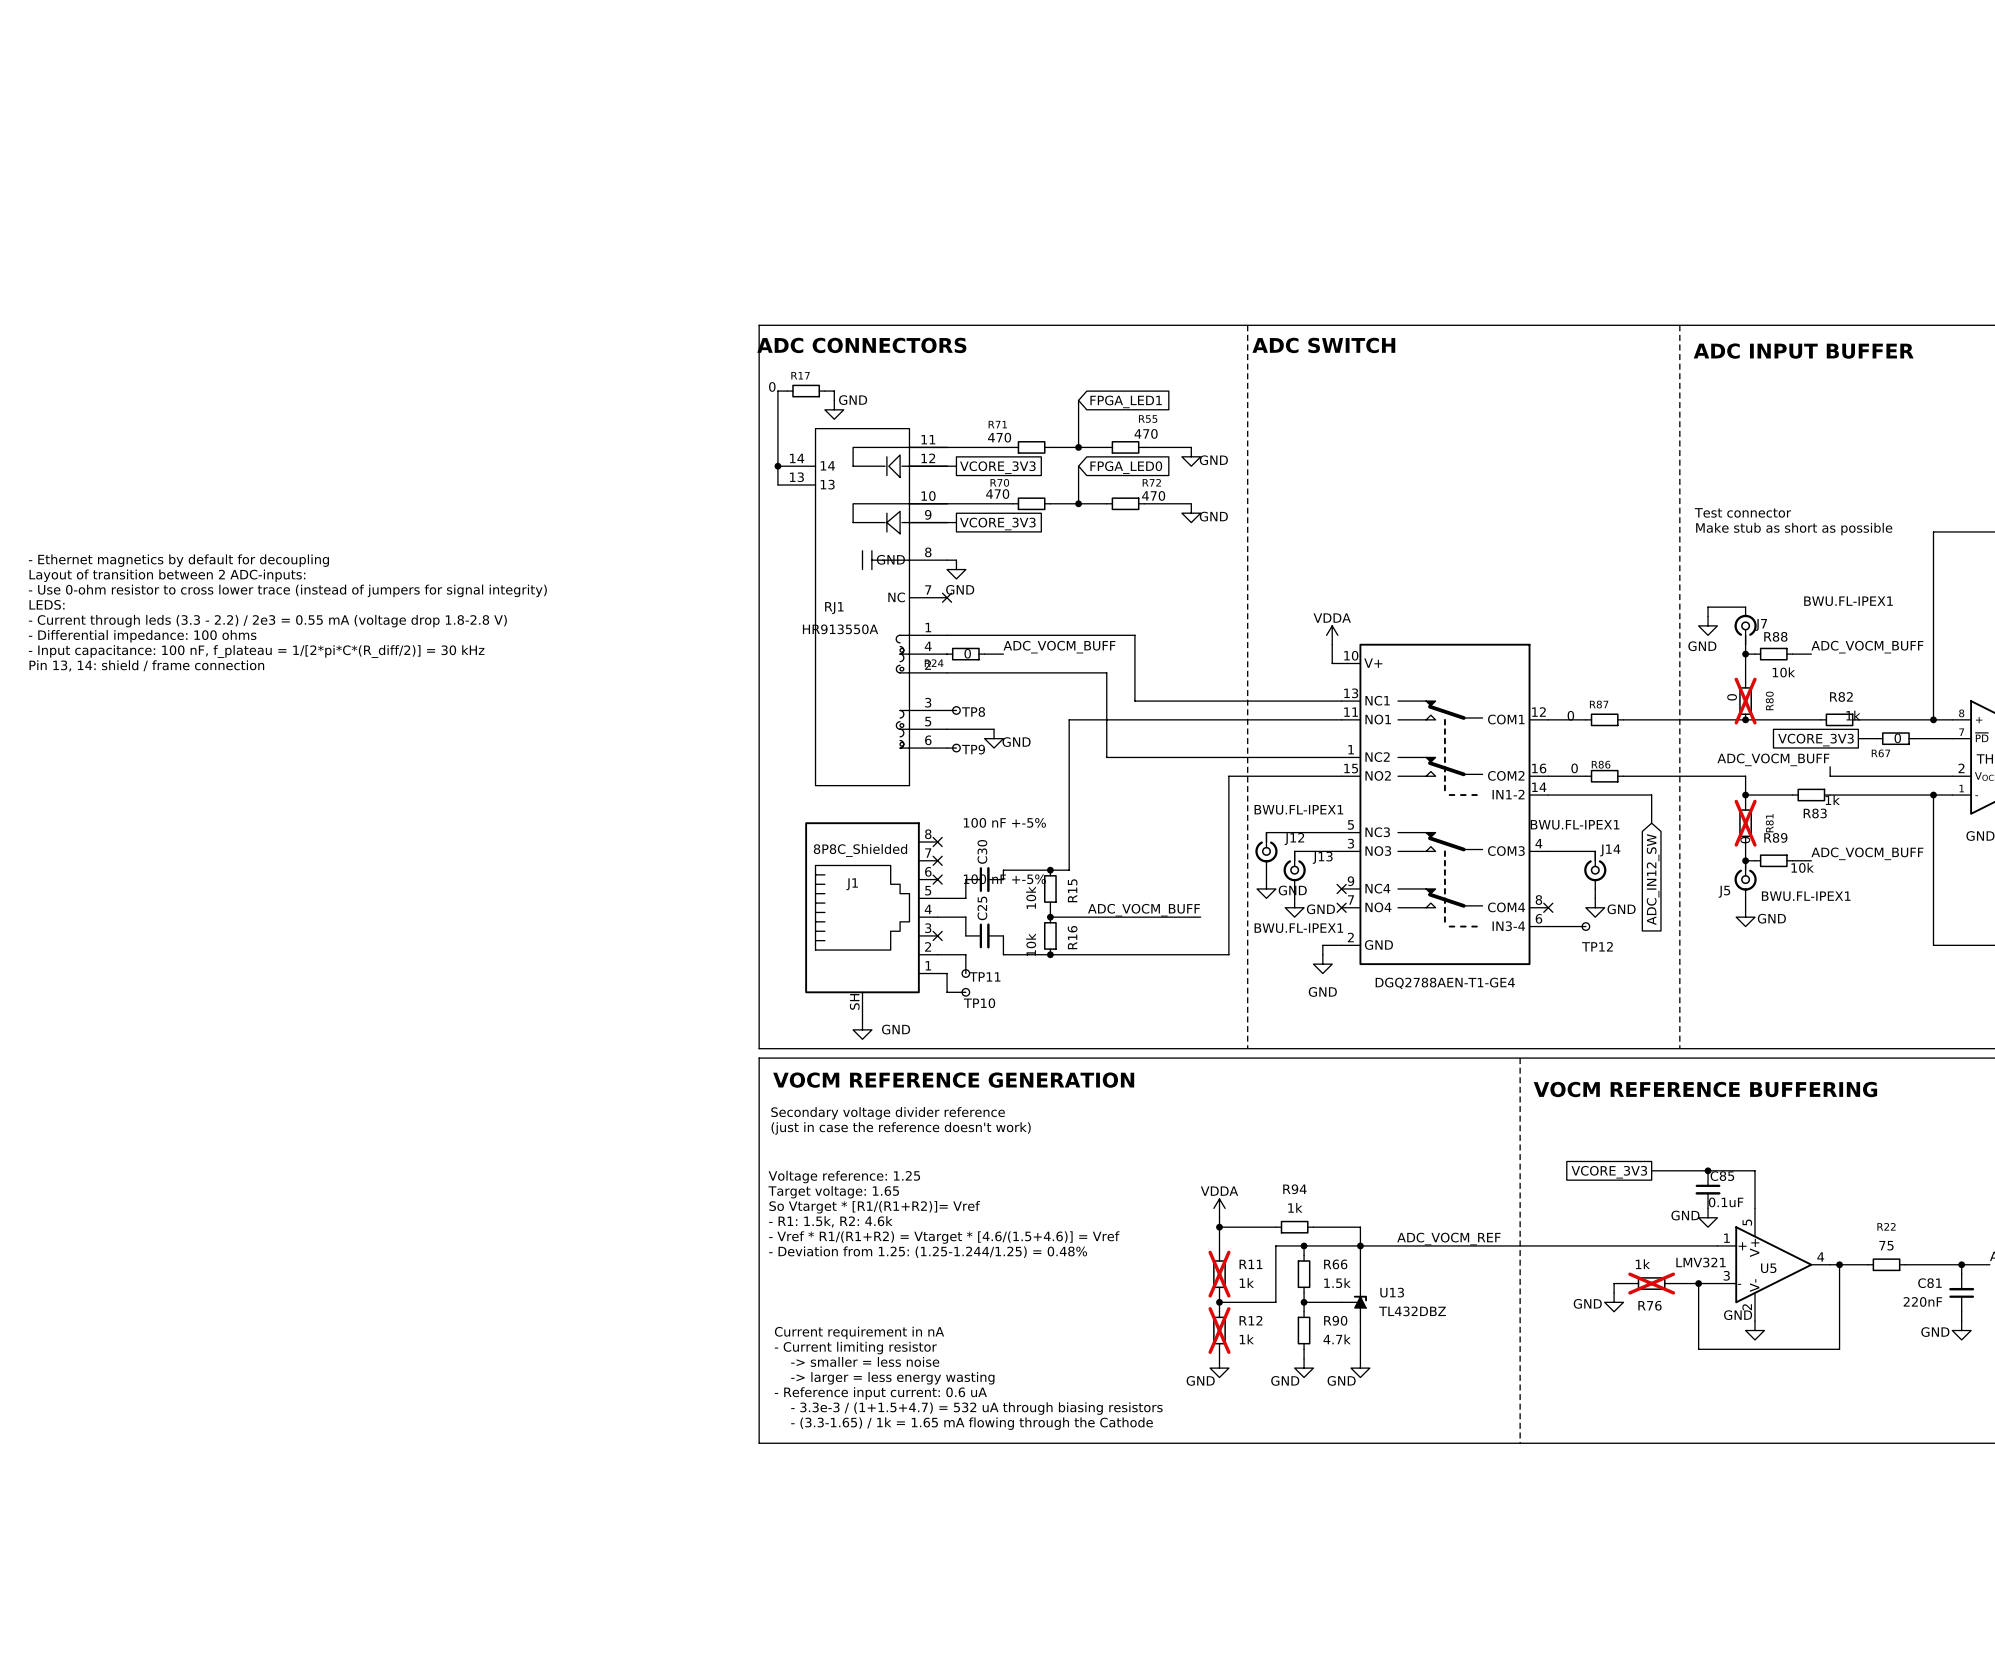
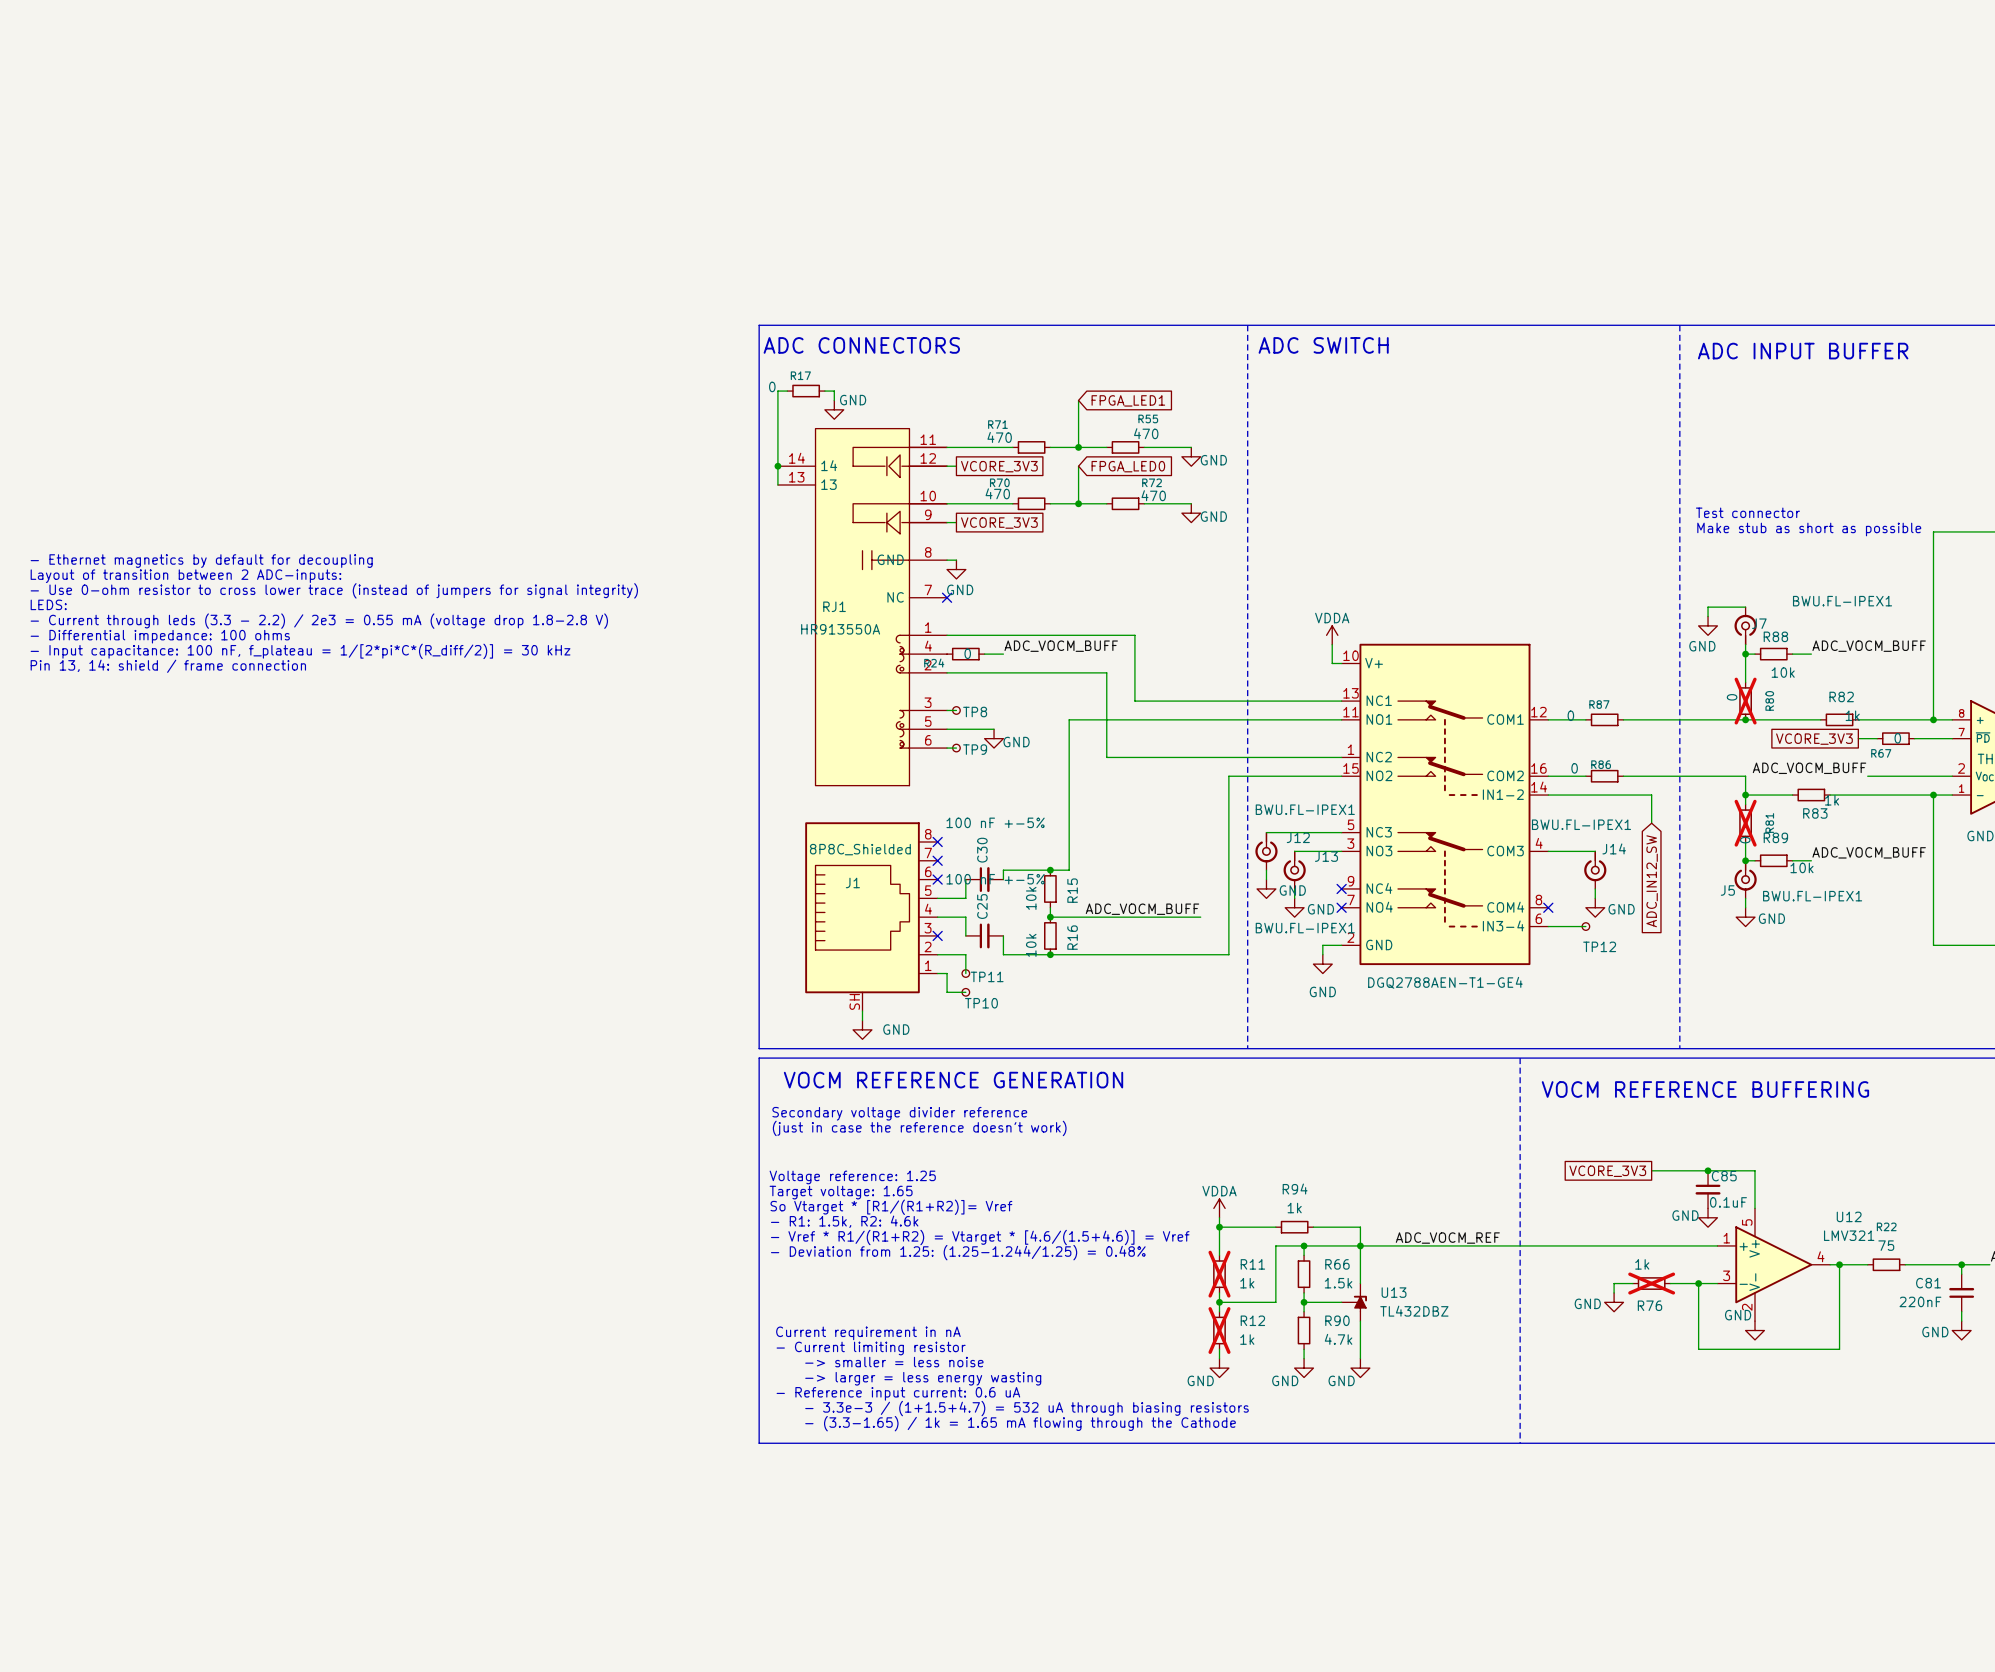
label position: ADC_VOCM_BUFF (1773, 759) -> ADC_VOCM_BUFF (1809, 768)
wire: (1830, 766) (1830, 776) (1867, 776) -> none
U5 value position: LMV321 (1700, 1262) -> LMV321 (1849, 1235)
U5 name: U5 (1768, 1268) -> U12 (1849, 1216)

